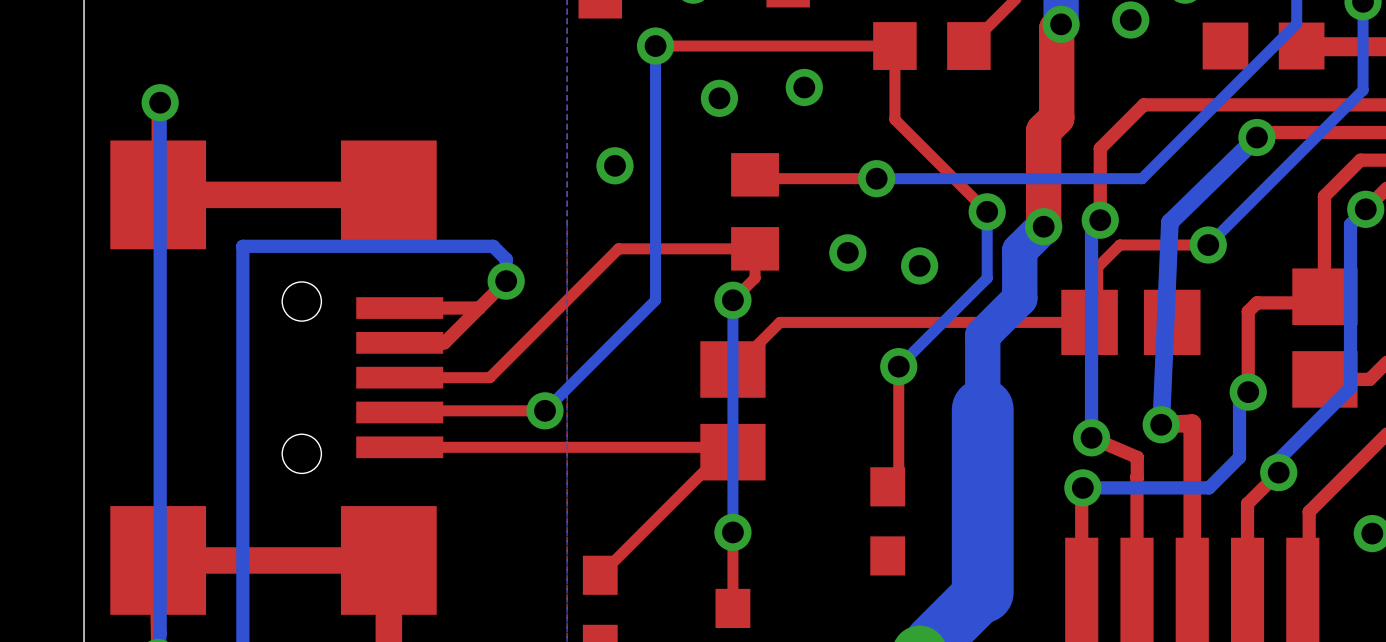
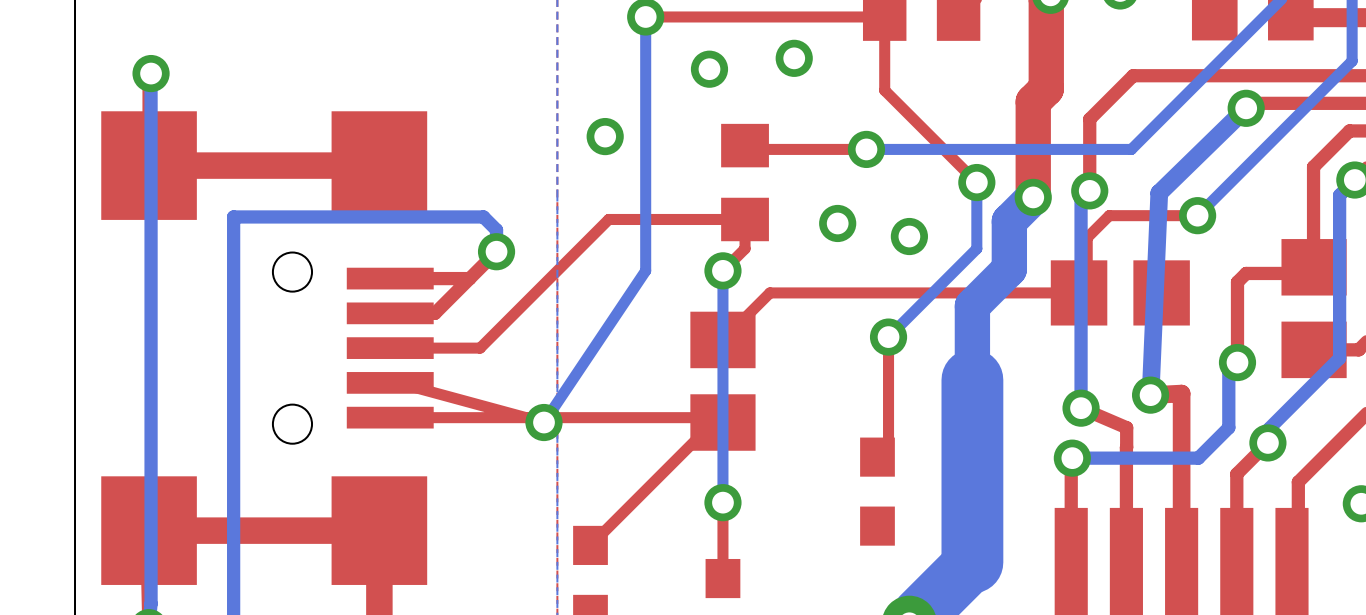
bottom track: (655, 300) (545, 410) -> (645, 270) (544, 422)
top track: (545, 410) (401, 410) -> (544, 422) (391, 381)
via position: (545, 410) -> (544, 422)

